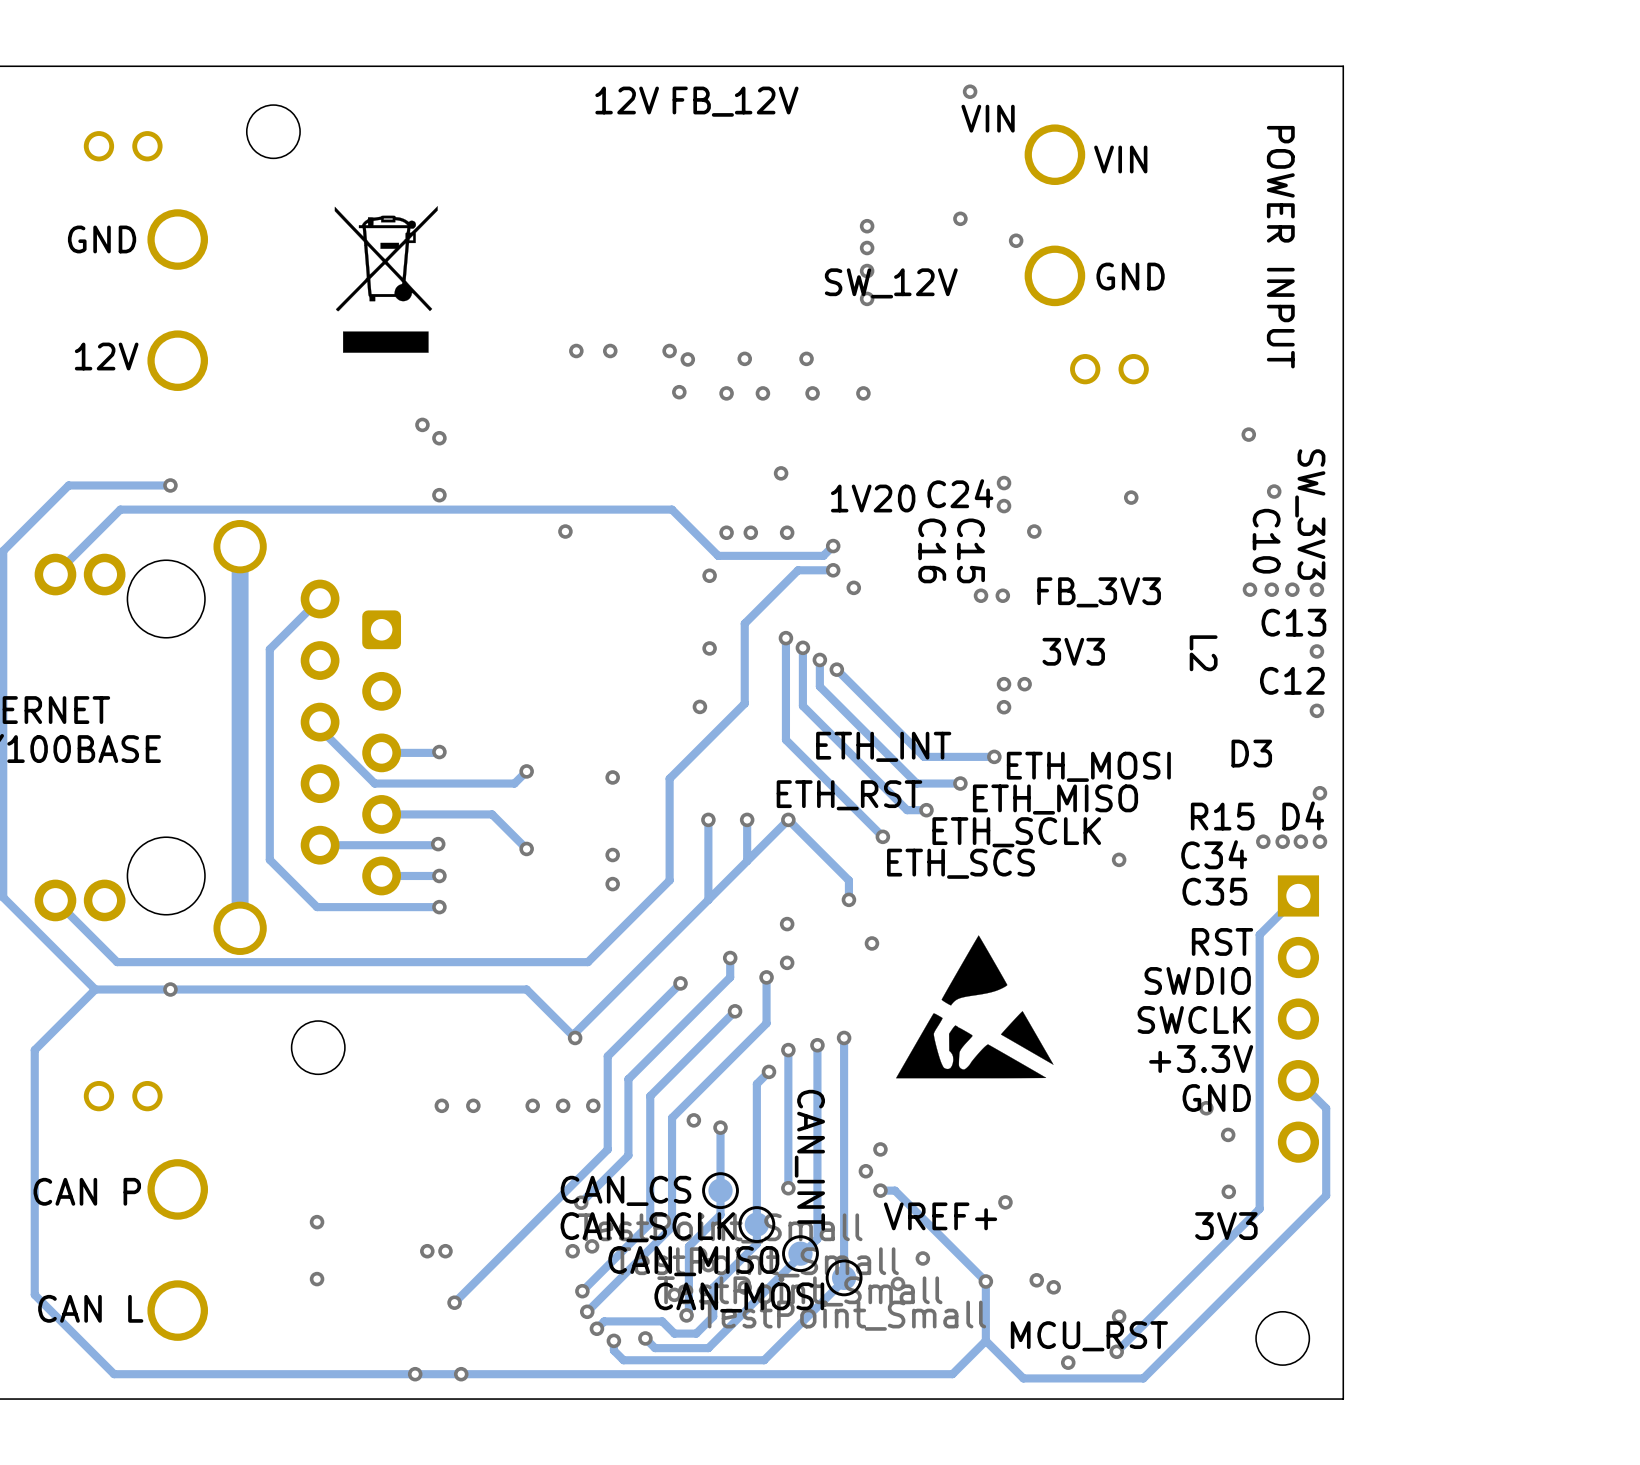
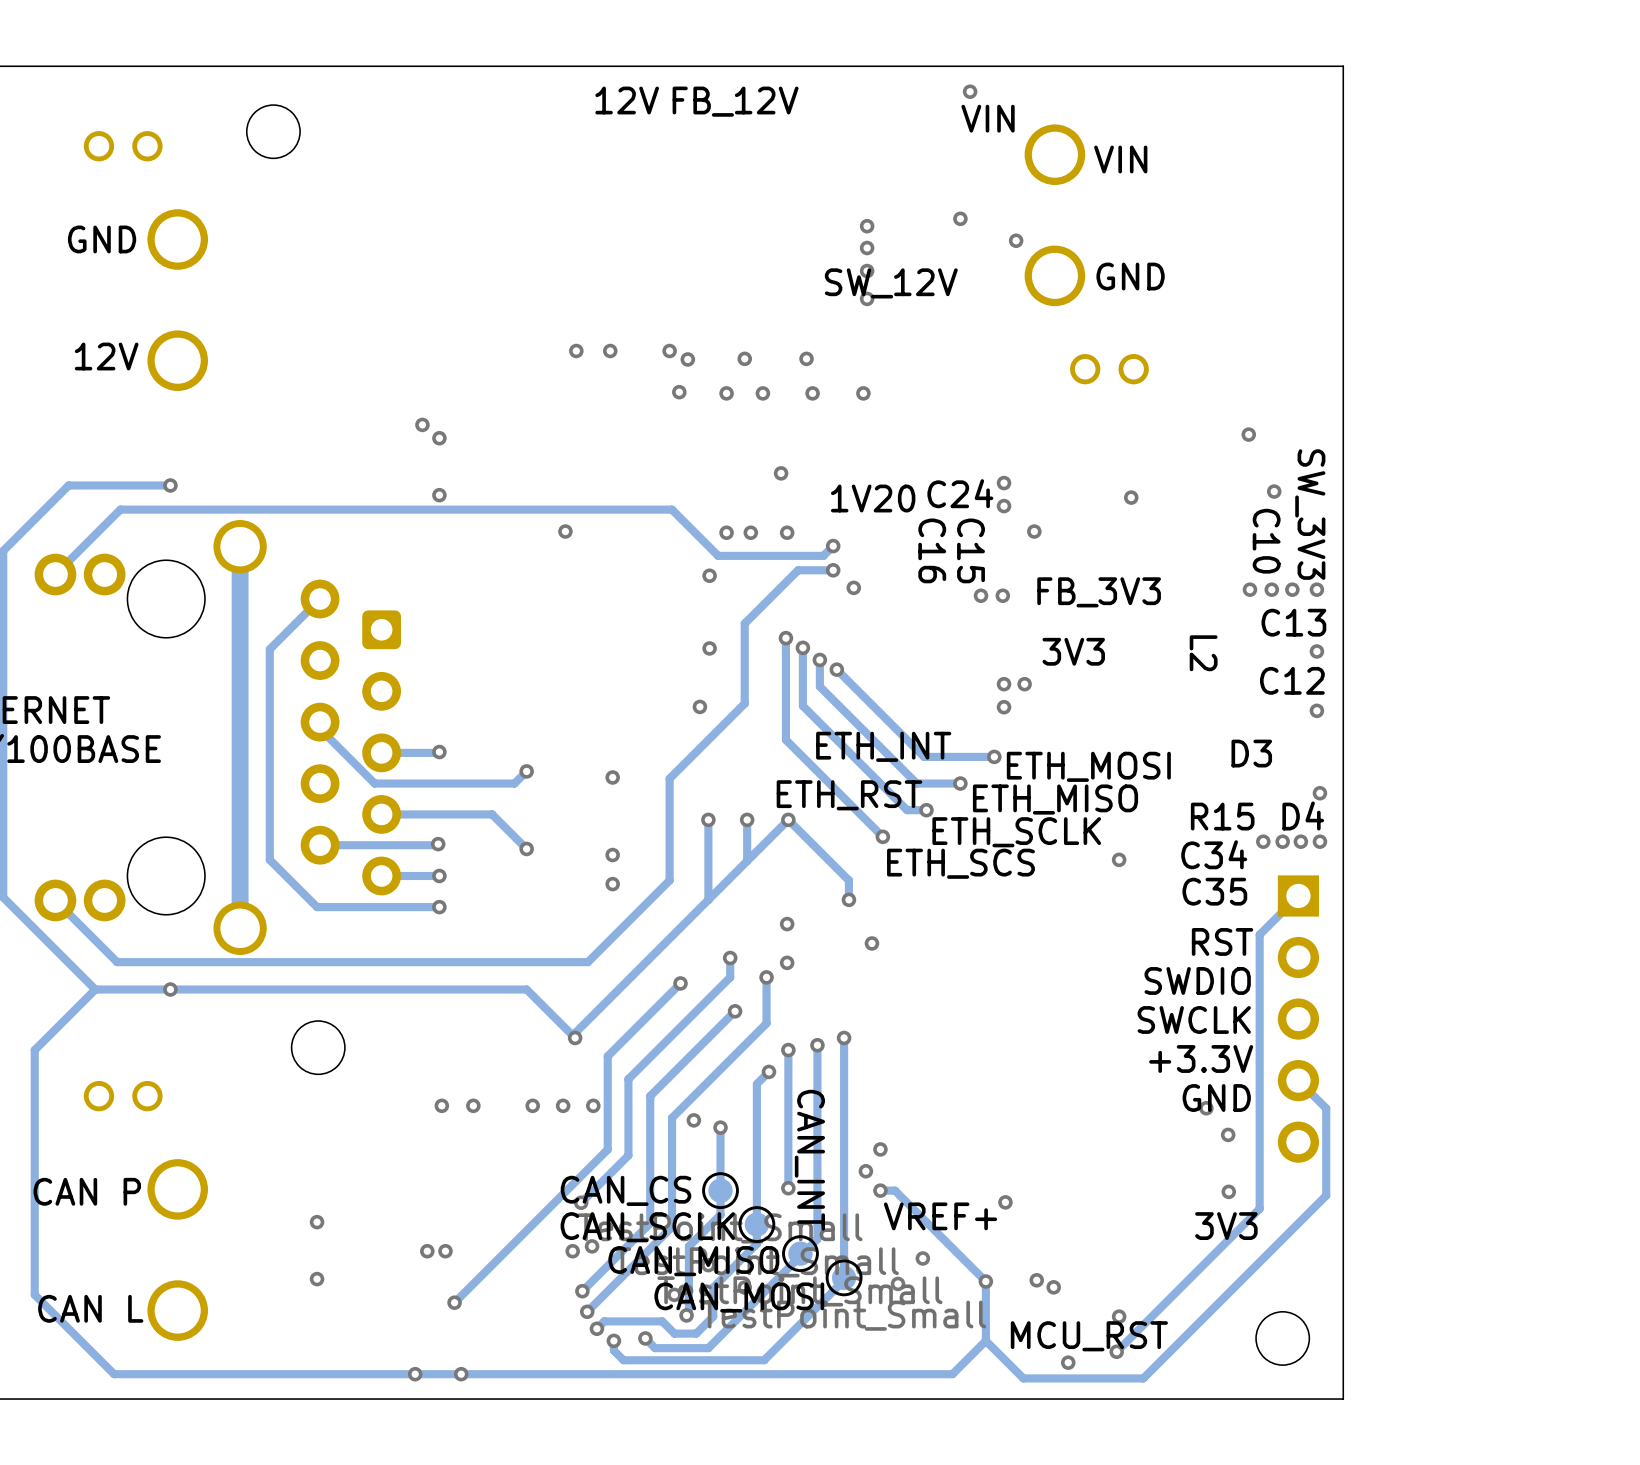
drawing: [334, 206, 438, 353] -> none
text: POWER INPUT (1280, 247) -> none
drawing: [896, 935, 1054, 1079] -> none

